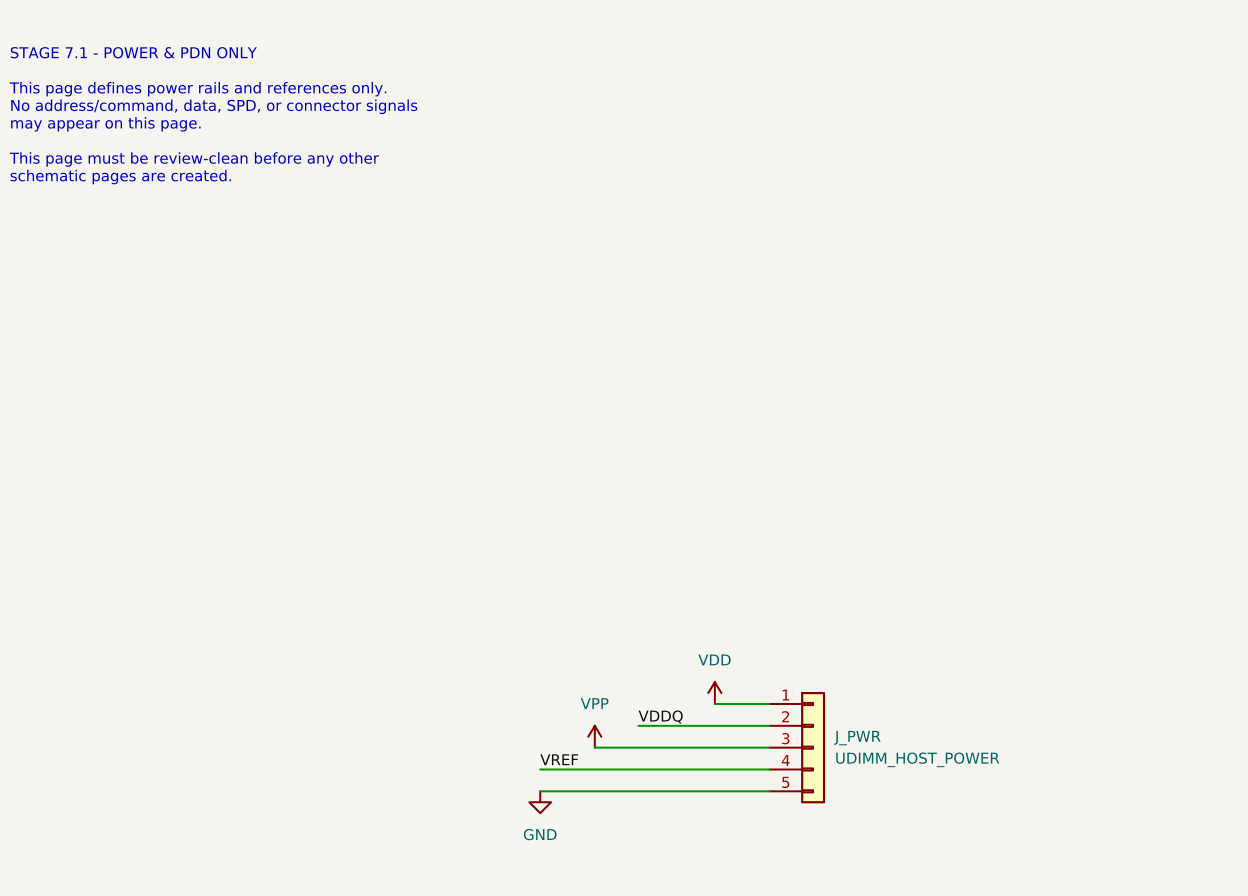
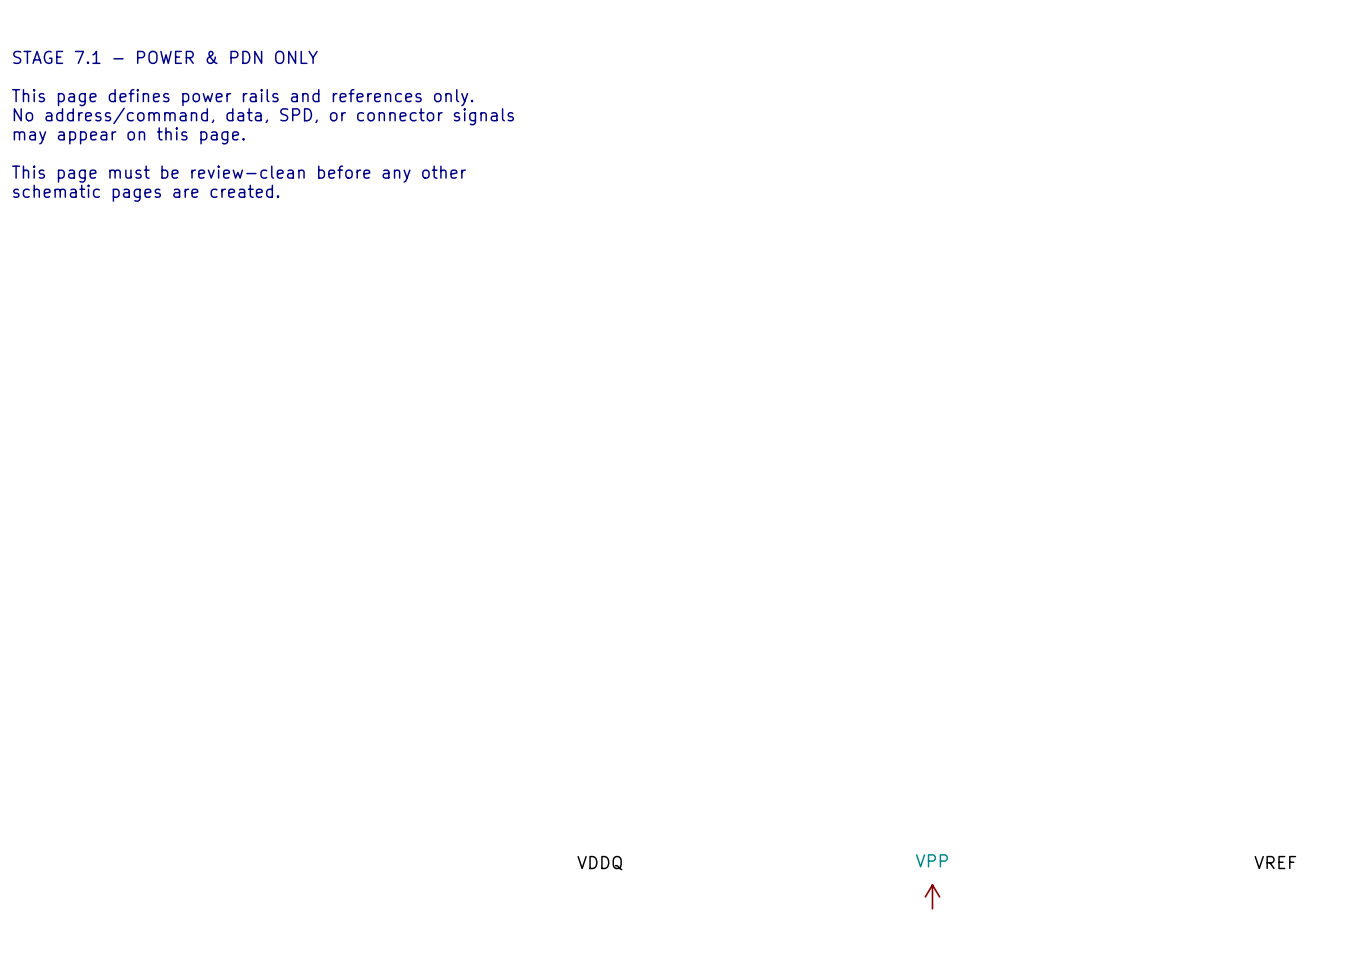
power symbol: VDD (714, 693) -> none
wire: (714, 704) (769, 704) -> none
label position: VDDQ (660, 716) -> VDDQ (599, 863)
wire: (638, 725) (769, 725) -> none
power symbol: VPP (594, 736) -> none
wire: (594, 747) (769, 747) -> none
J_PWR: UDIMM_HOST_POWER (797, 747) -> none
label: VREF (559, 759) -> none
wire: (540, 769) (769, 769) -> none
wire: (540, 791) (769, 791) -> none
label: none -> VREF (1275, 862)
power symbol: GND (540, 802) -> none
power symbol: none -> VPP (932, 896)

